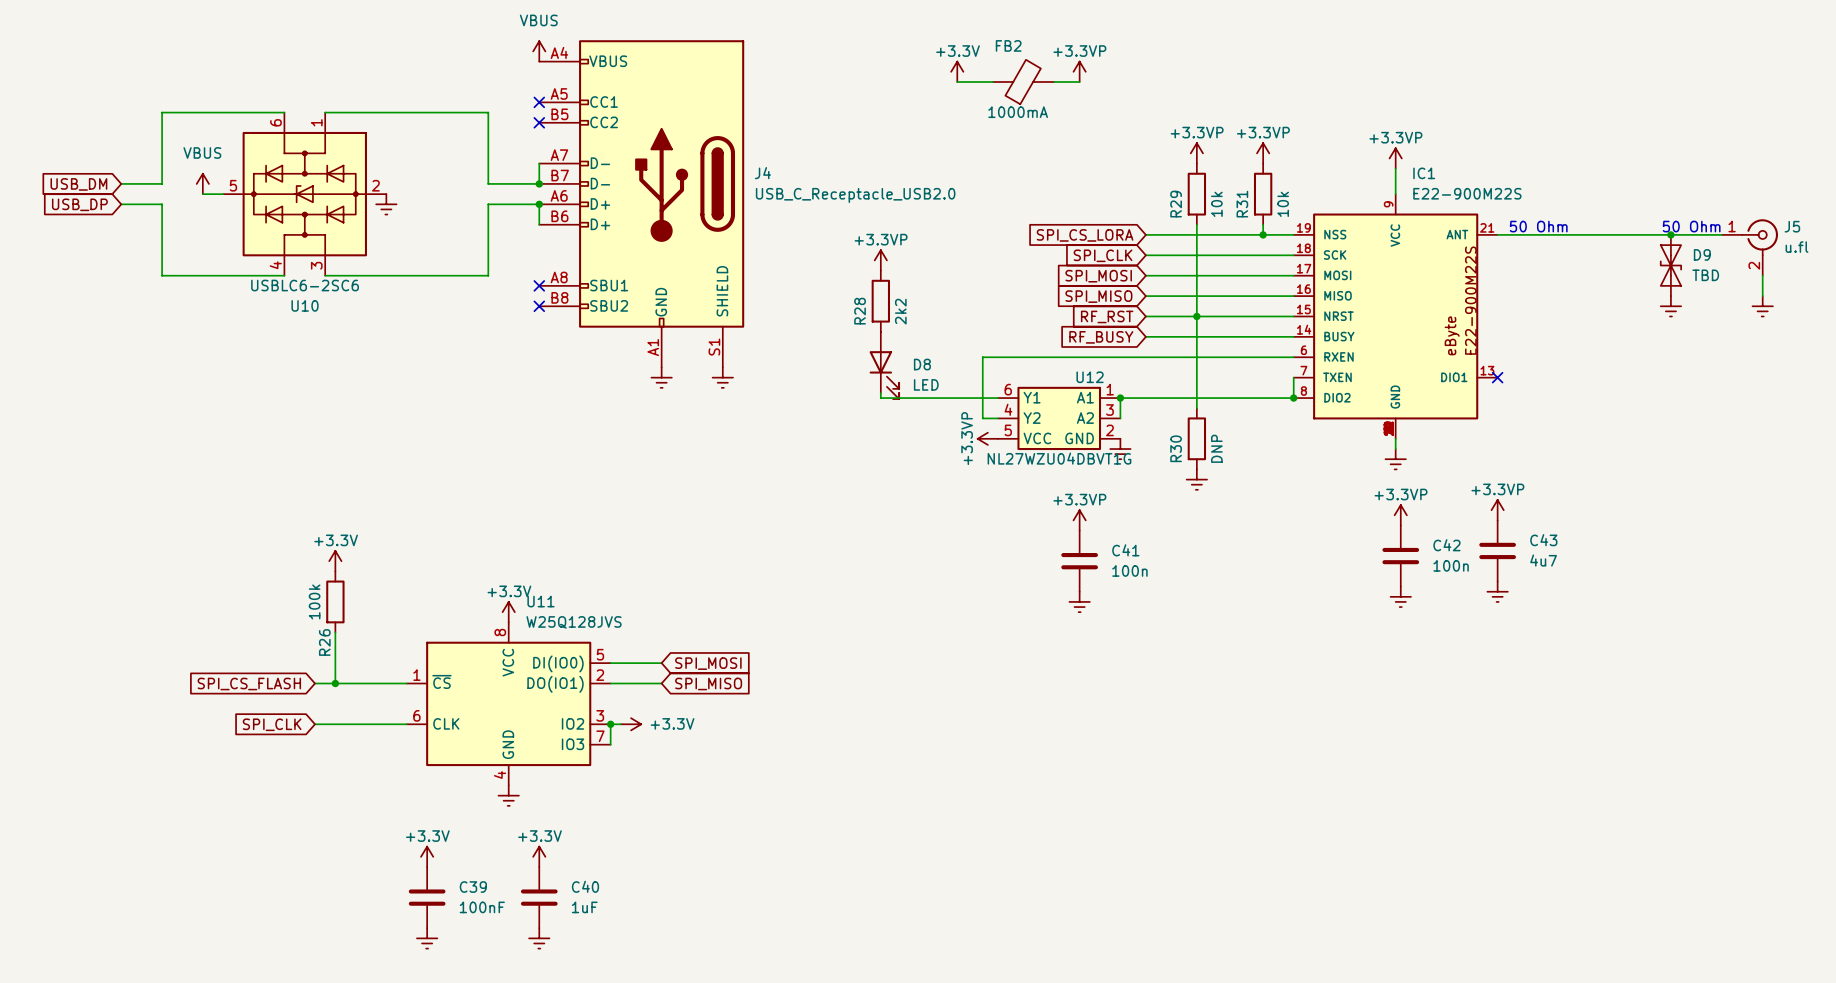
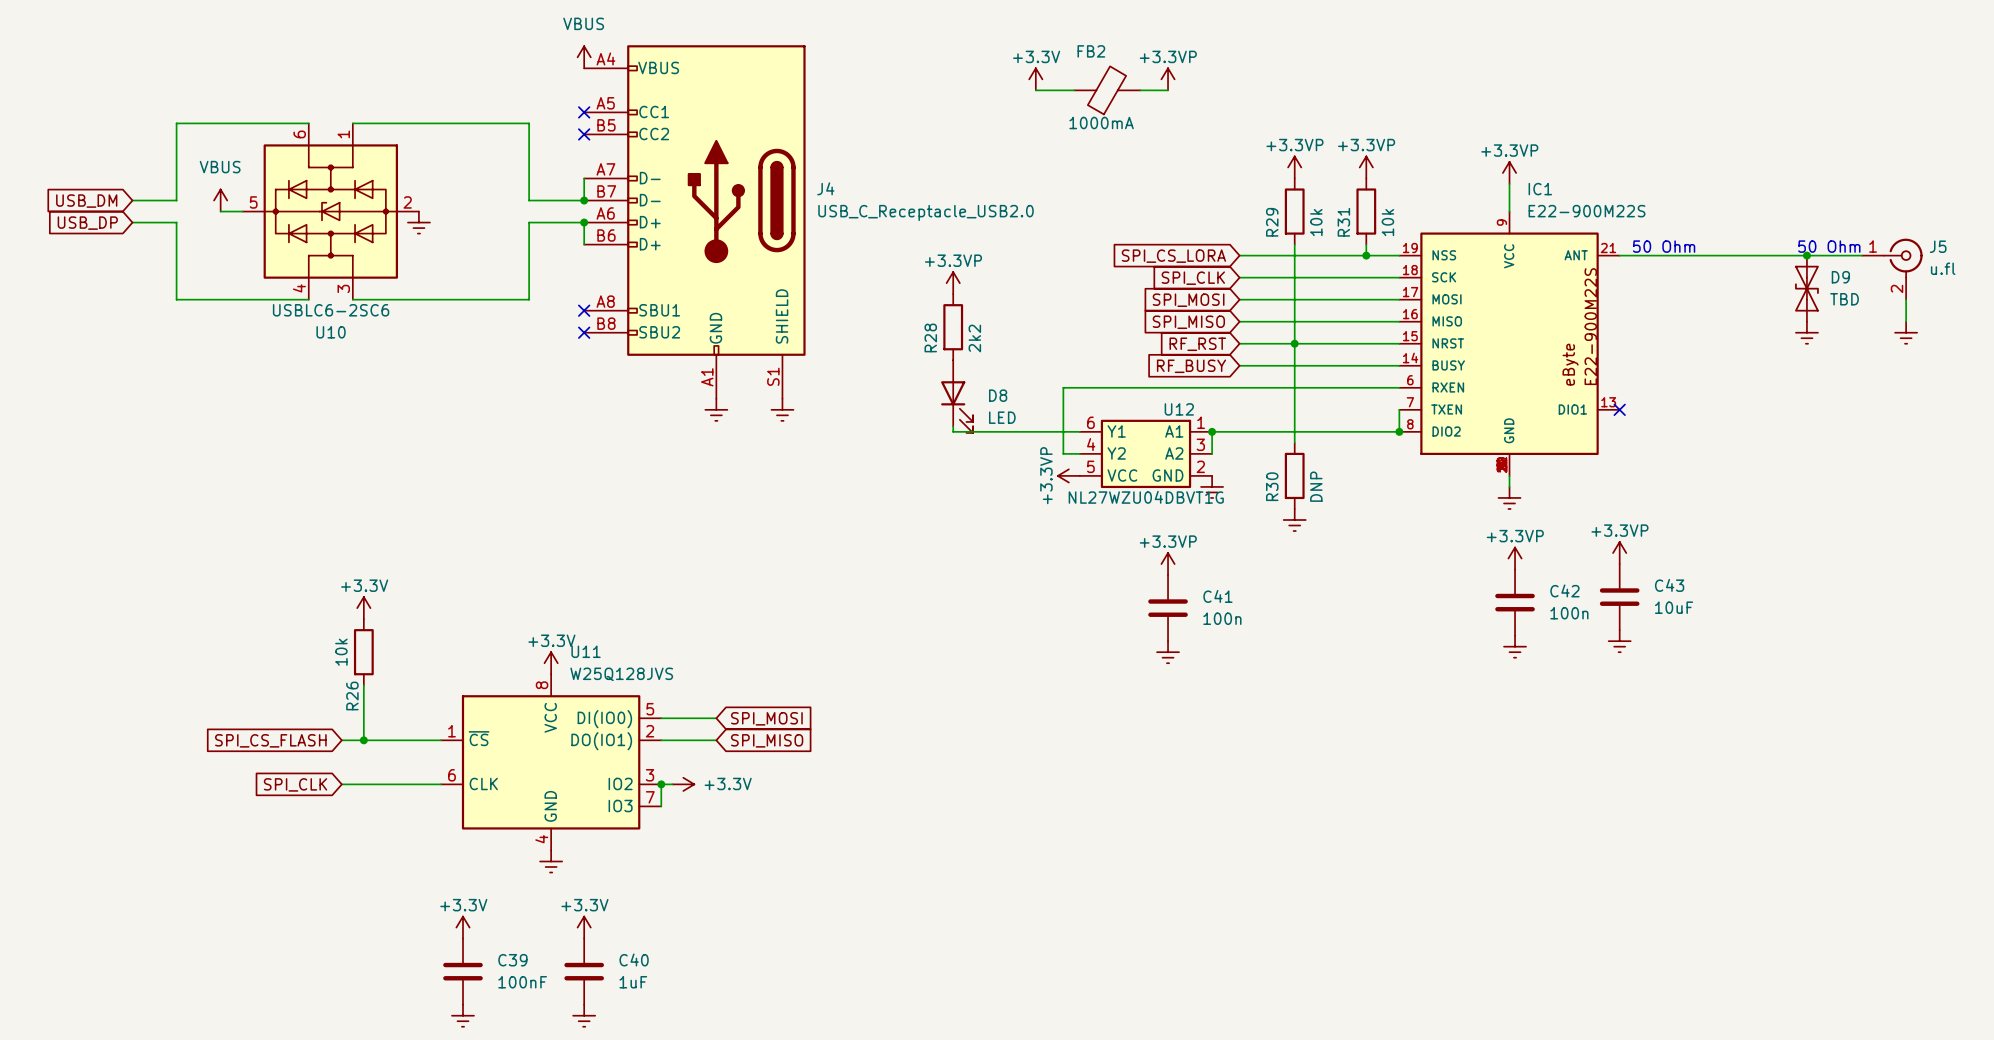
C43 value: 4u7 (1543, 560) -> 10uF (1674, 607)
R26 value: 100k (314, 601) -> 10k (341, 652)

